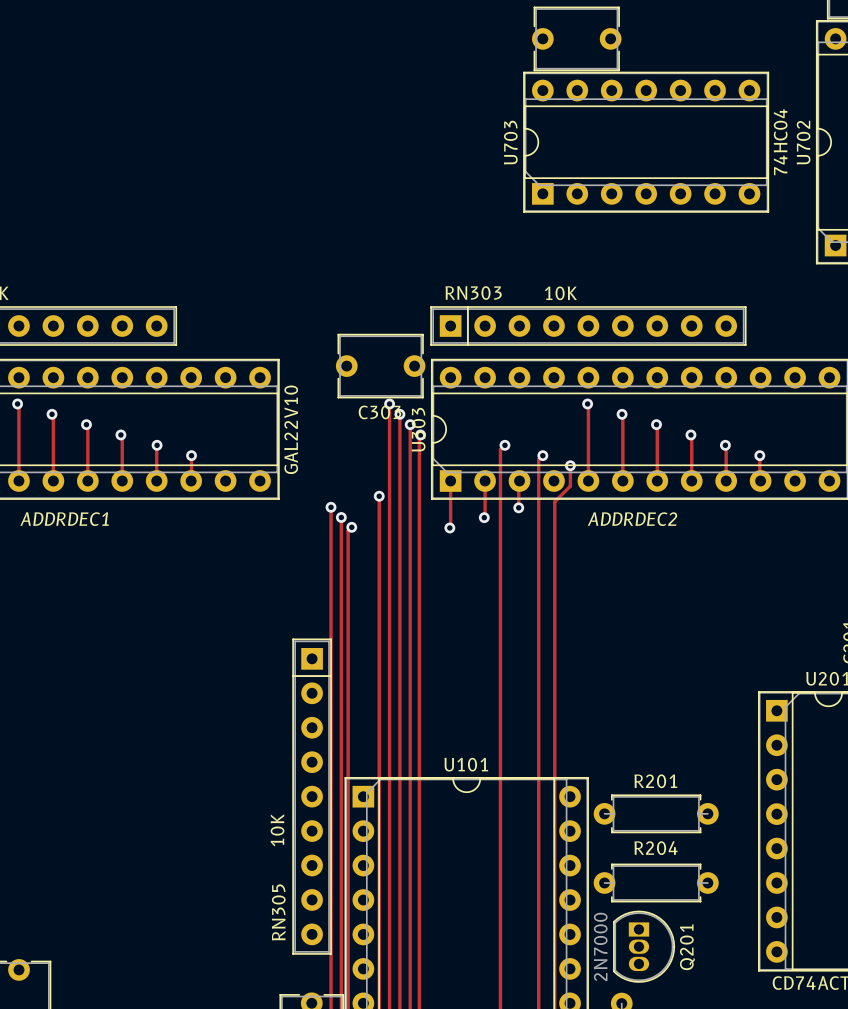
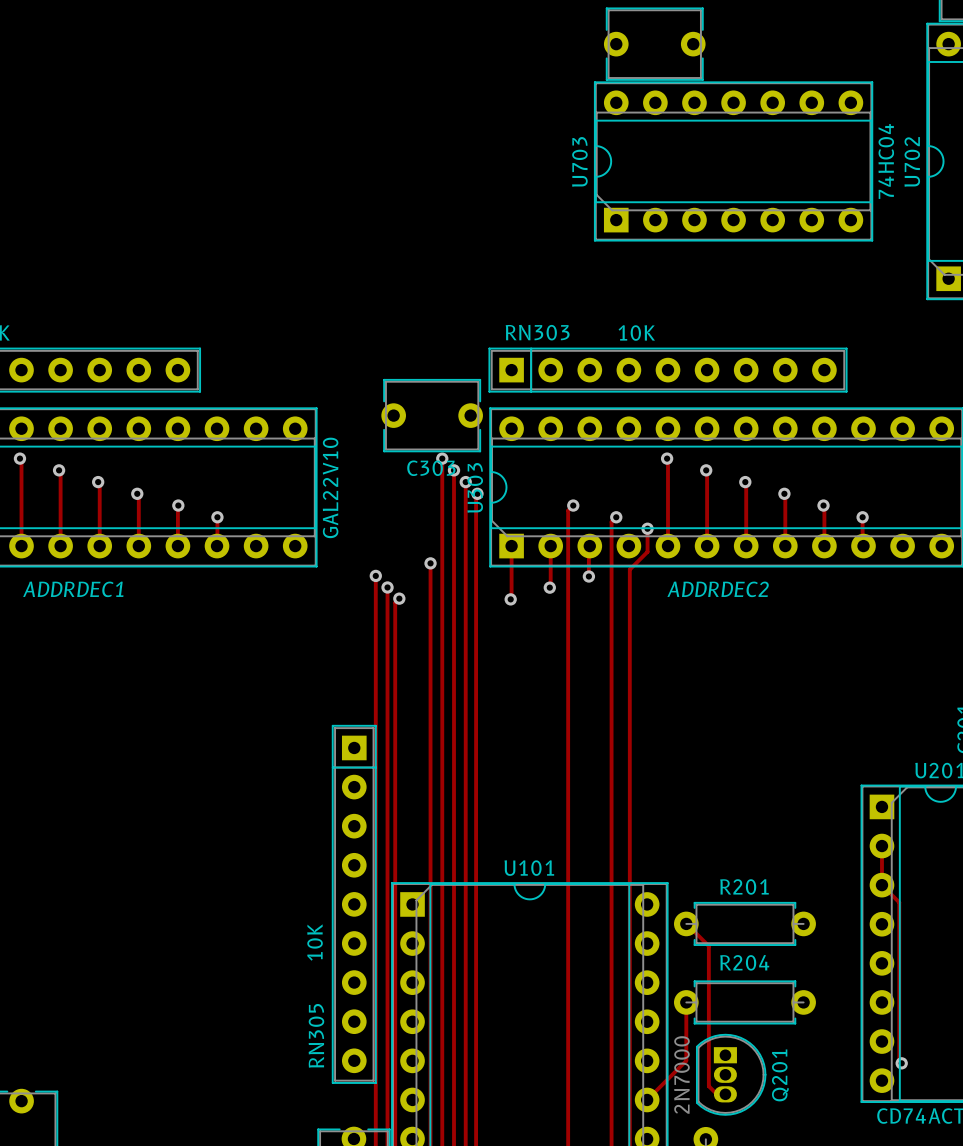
track: none -> (881, 846) (881, 885) (899, 902) (899, 1060) (901, 1063)
track: none -> (686, 923) (708, 946) (708, 1086) (716, 1094) (725, 1094)
track: none -> (686, 1002) (686, 1060) (647, 1099)
via: none -> (901, 1063)

